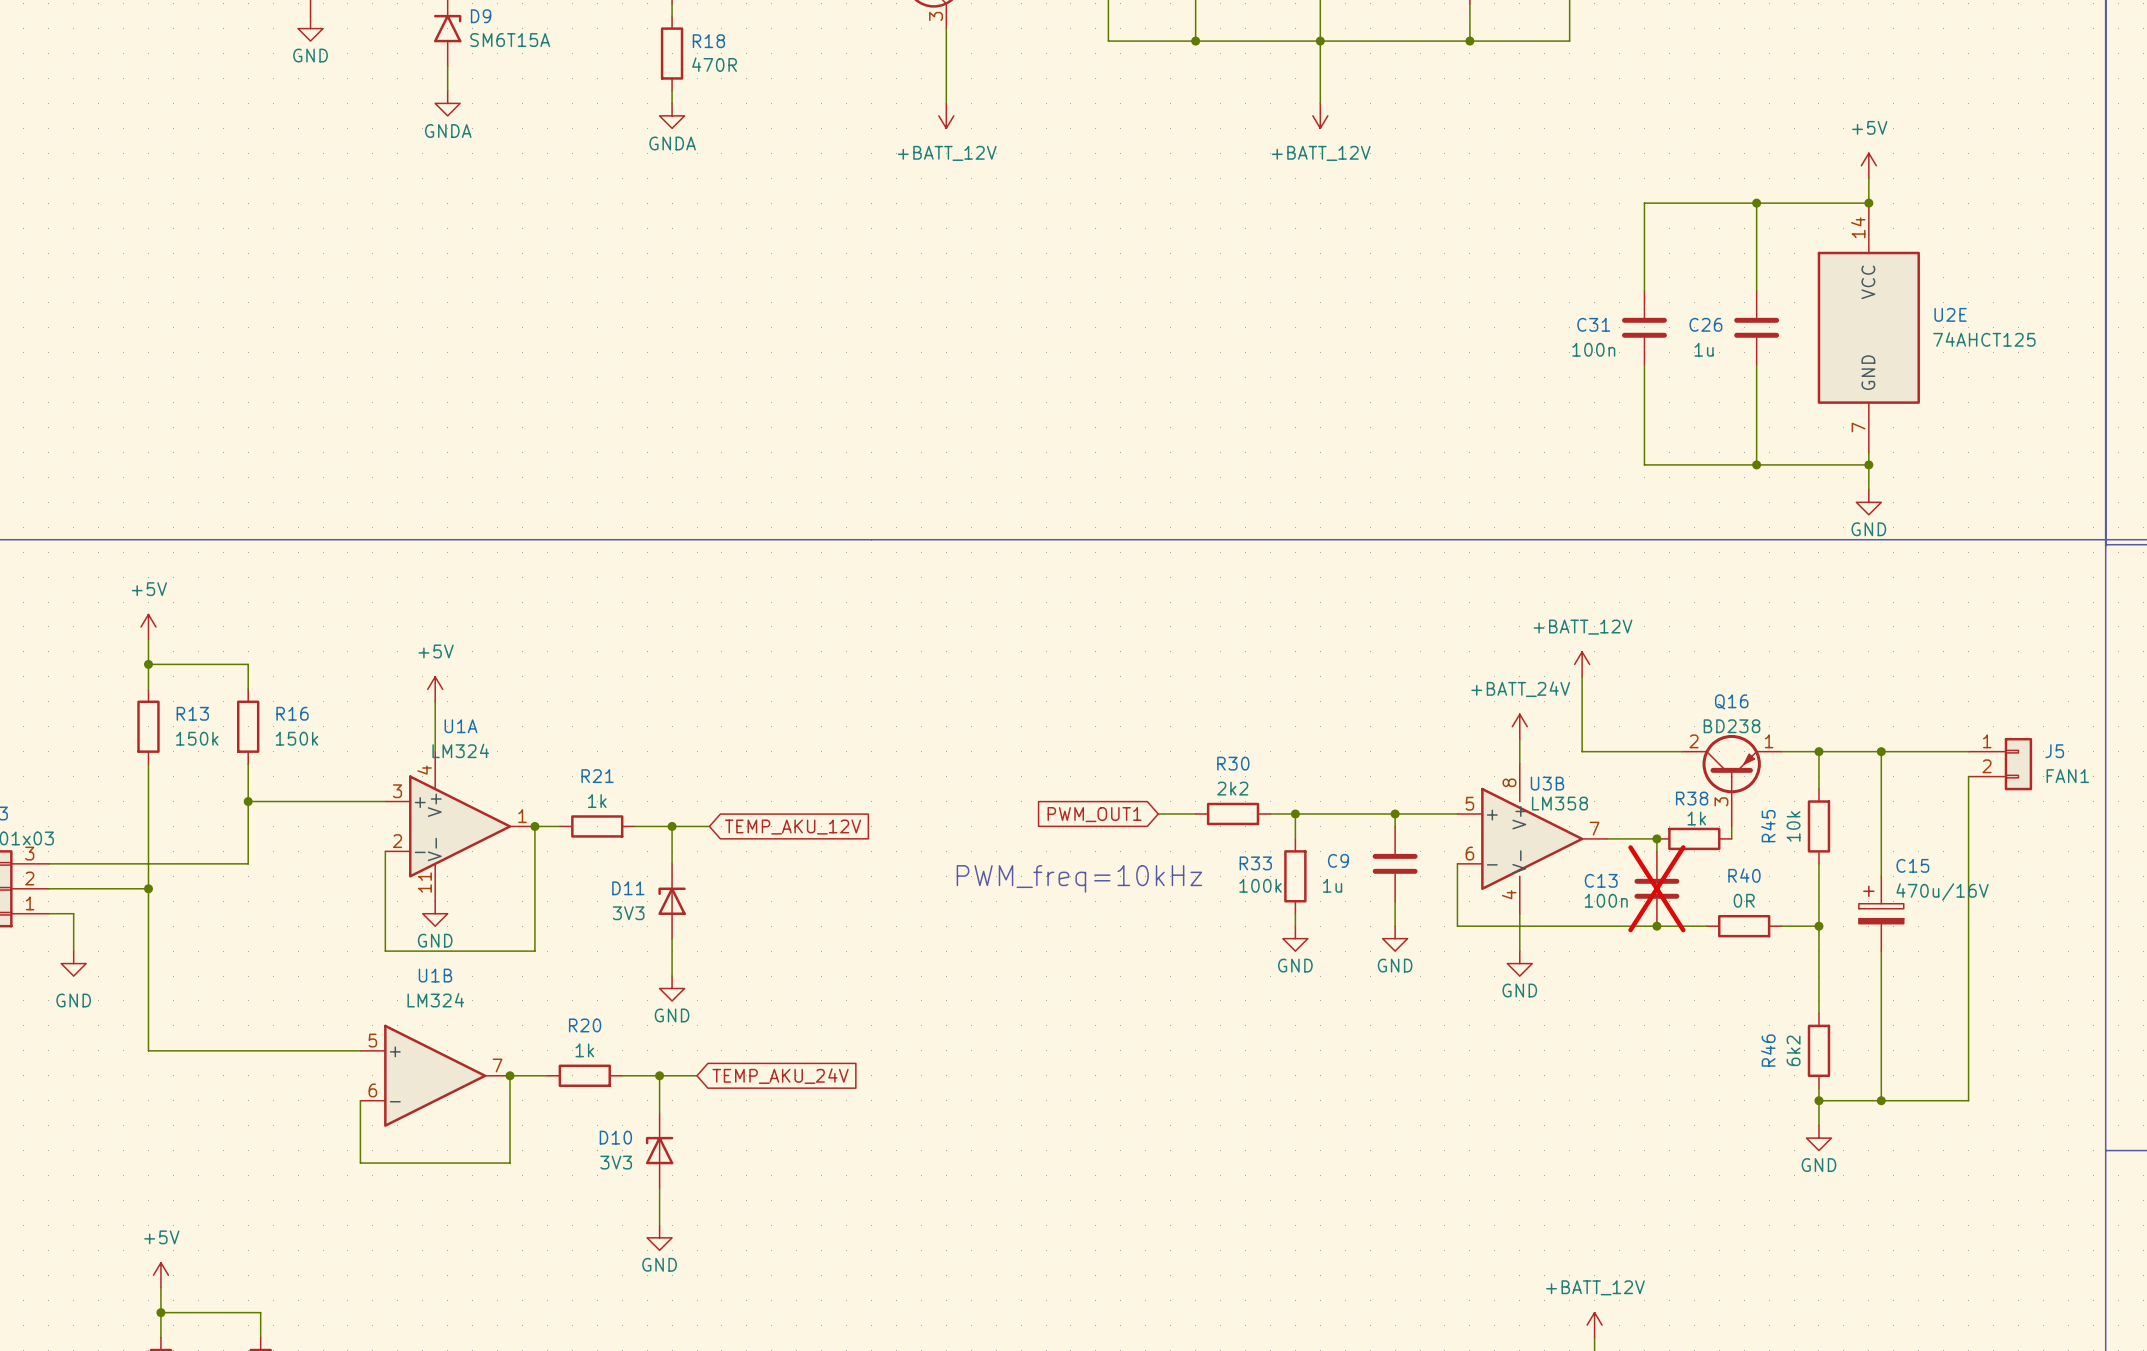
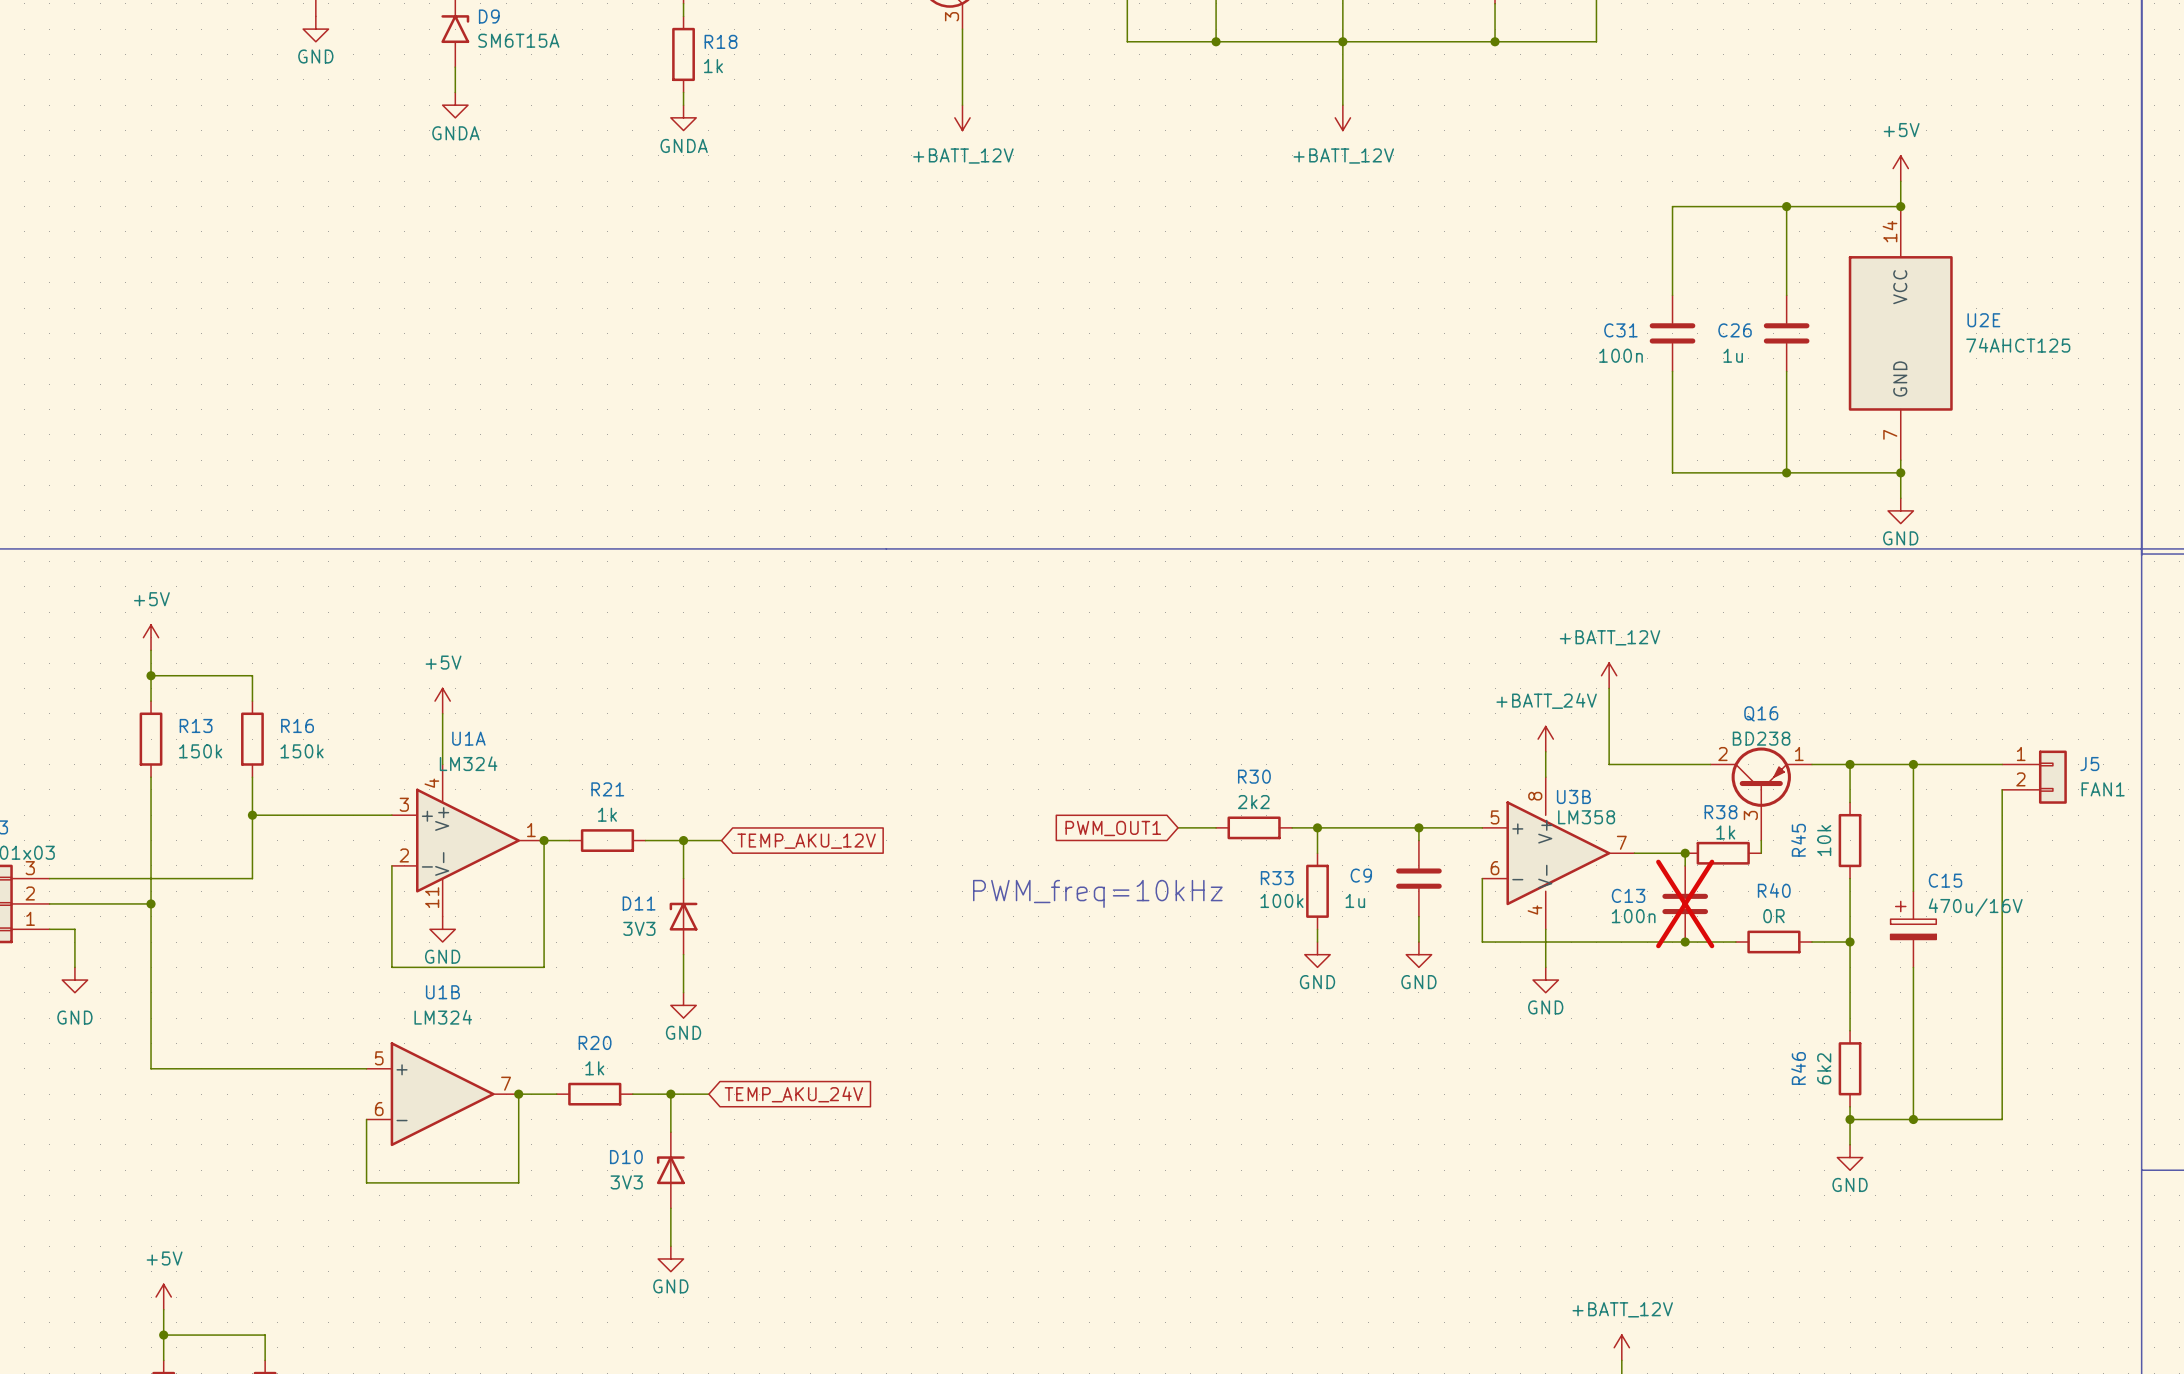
R18 value: 470R (714, 64) -> 1k (713, 66)

